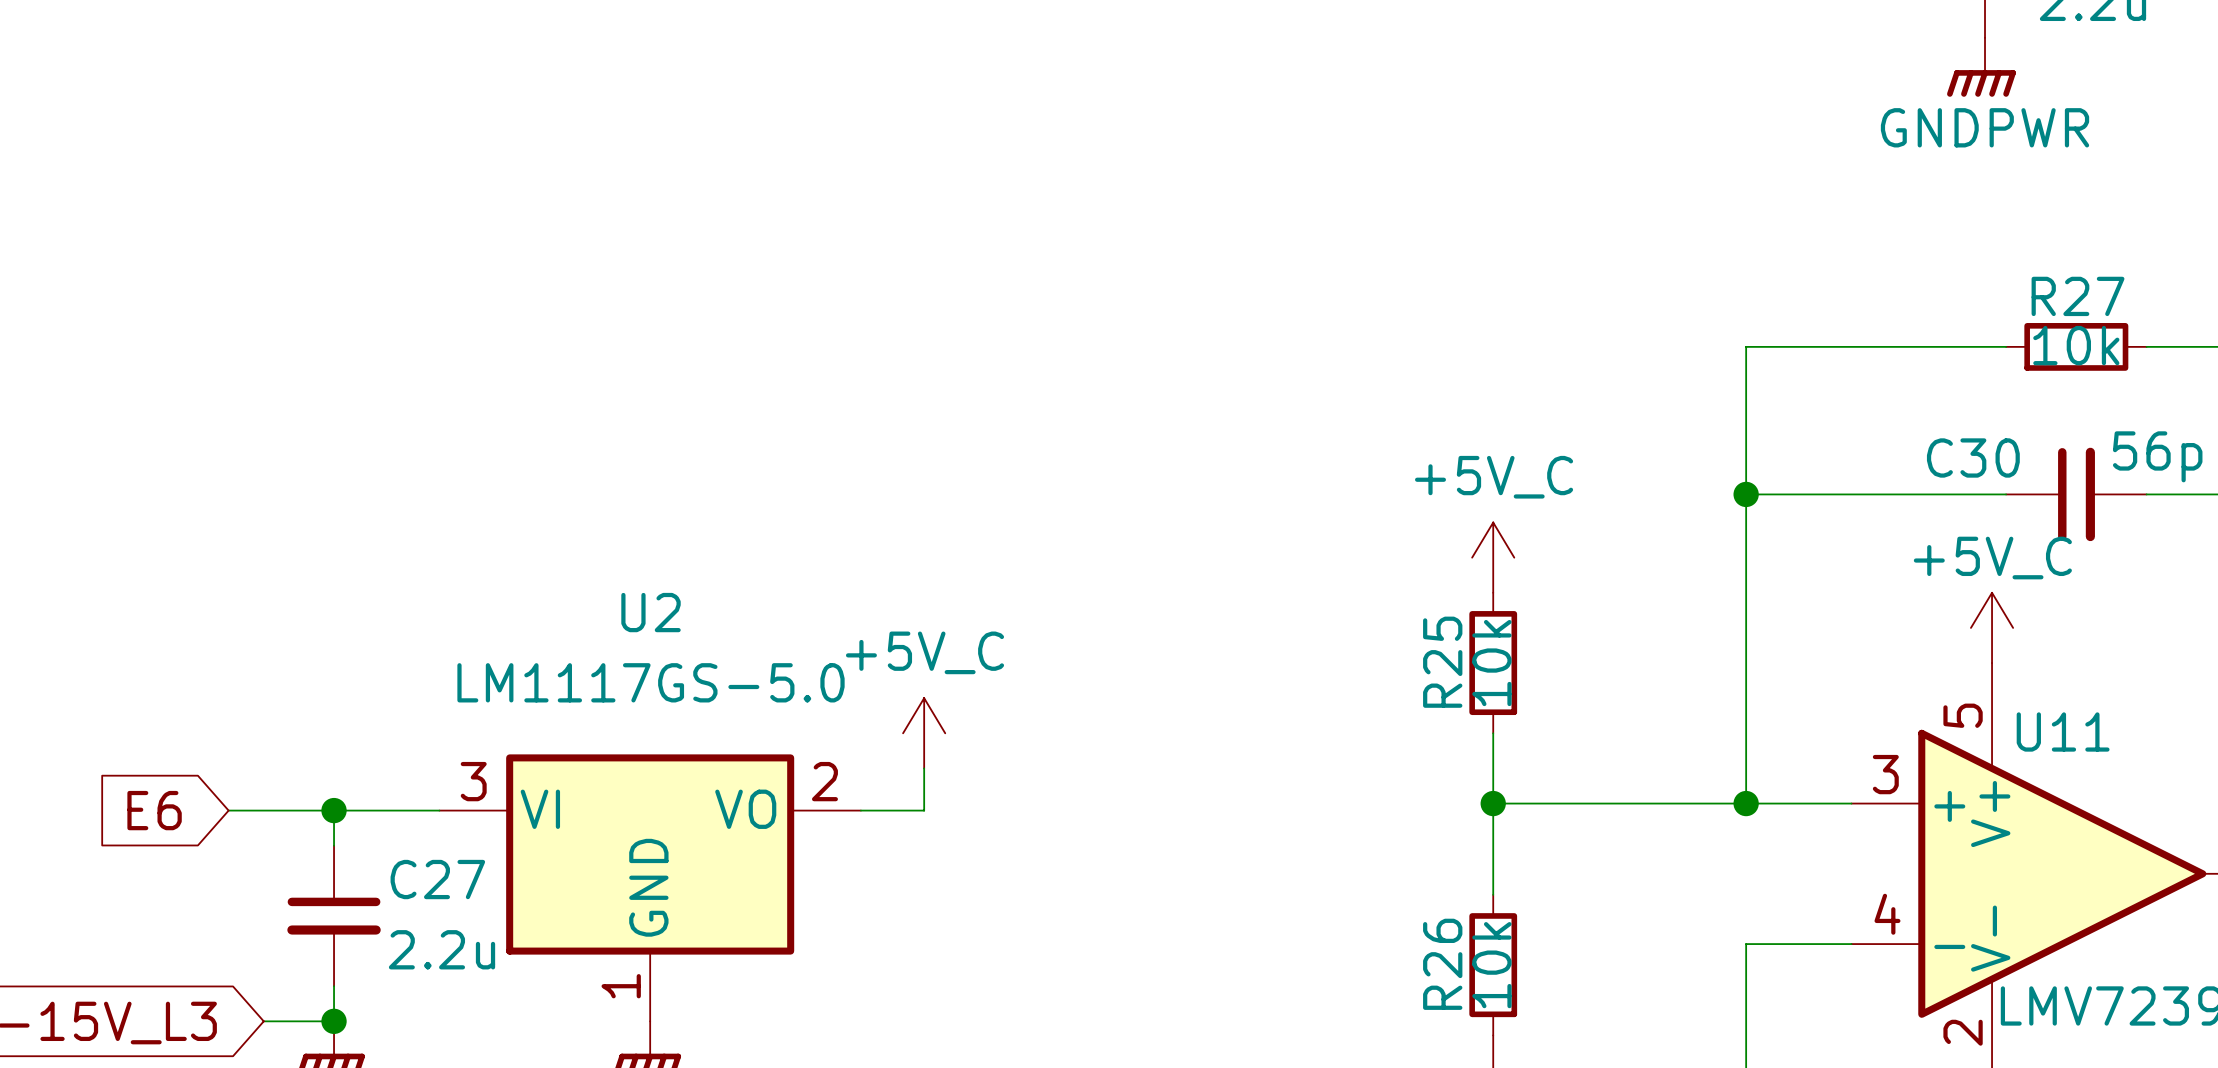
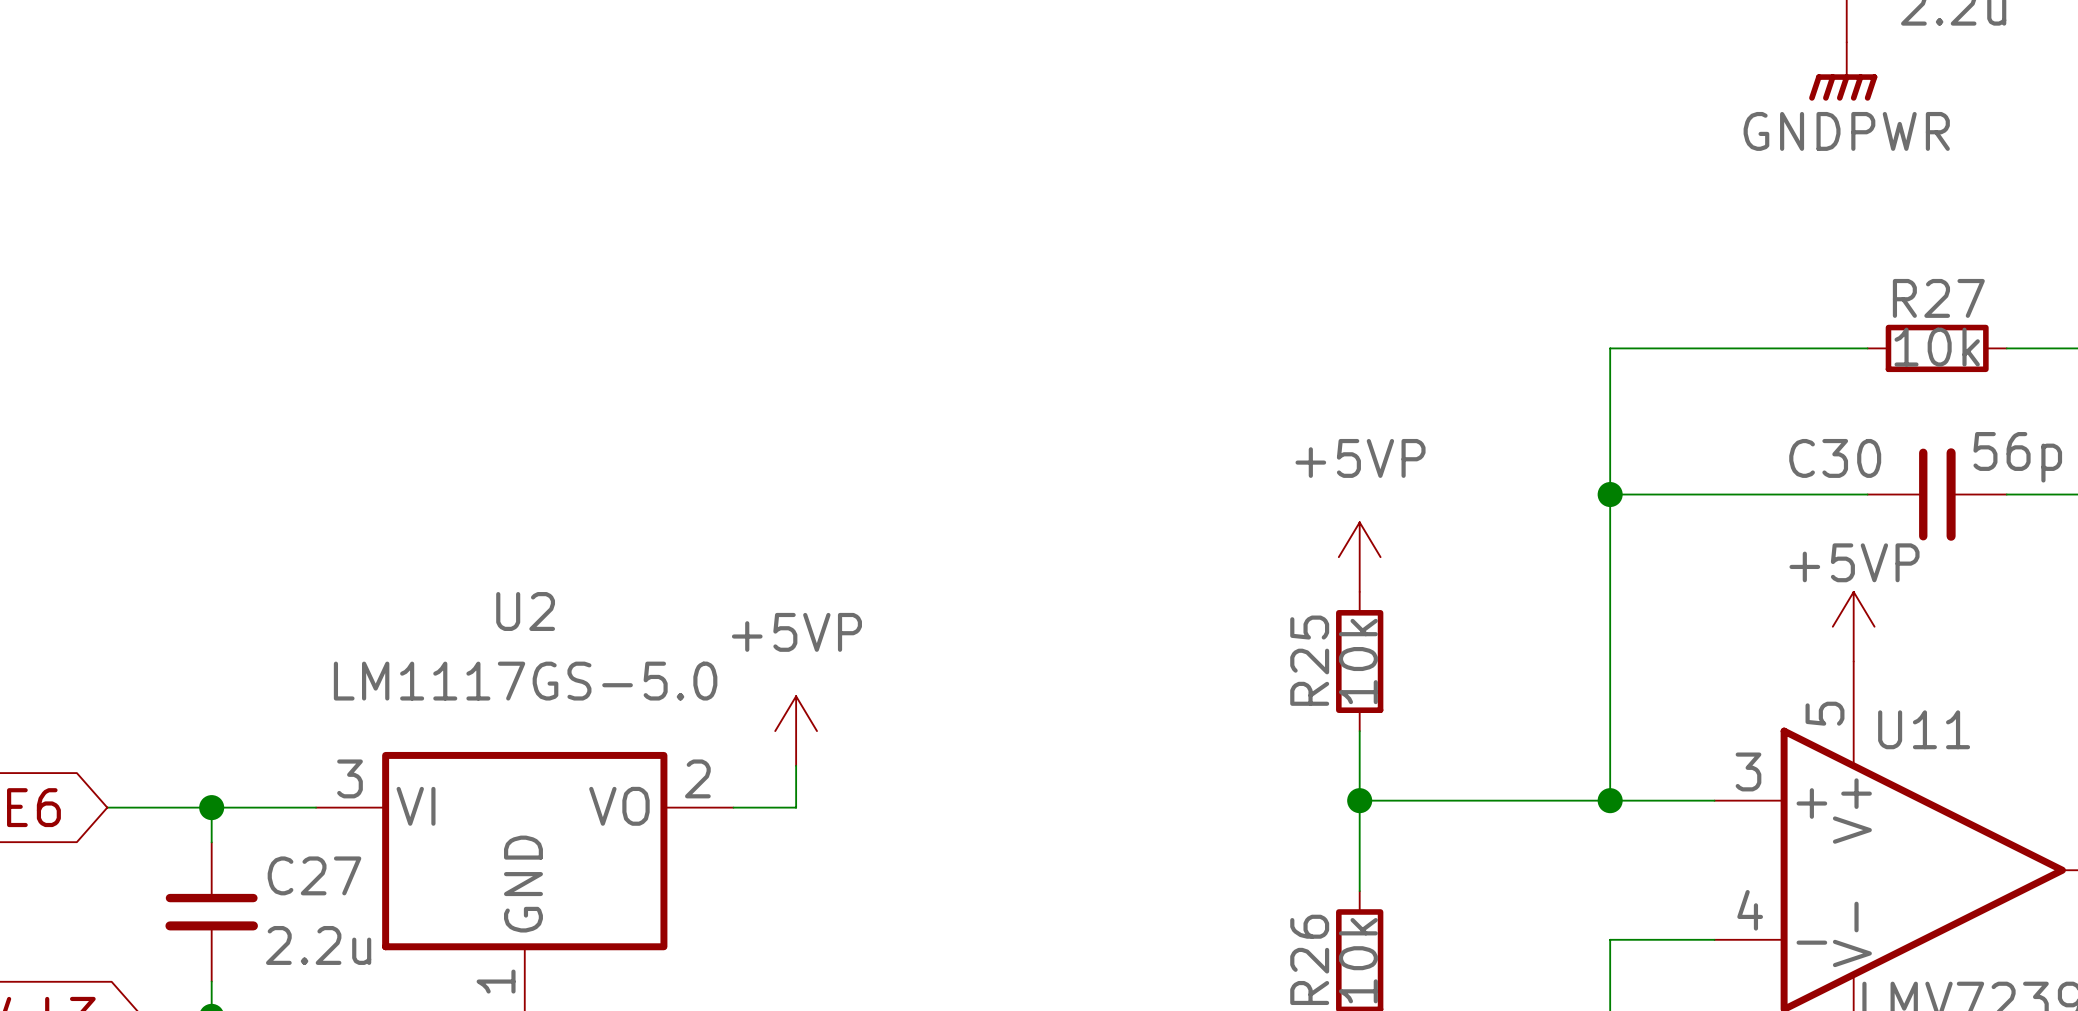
power symbol: +5V_C (1493, 557) -> +5VP (1359, 557)
power symbol: +5V_C (1992, 627) -> +5VP (1853, 626)
power symbol: +5V_C (924, 733) -> +5VP (796, 731)

